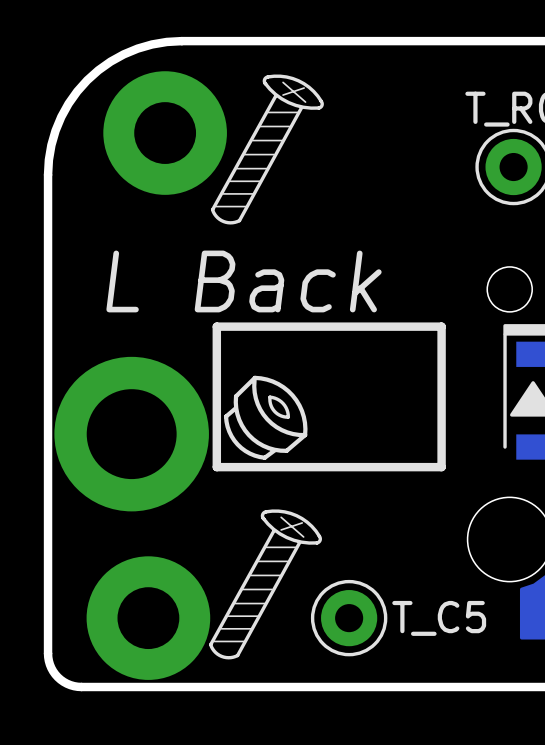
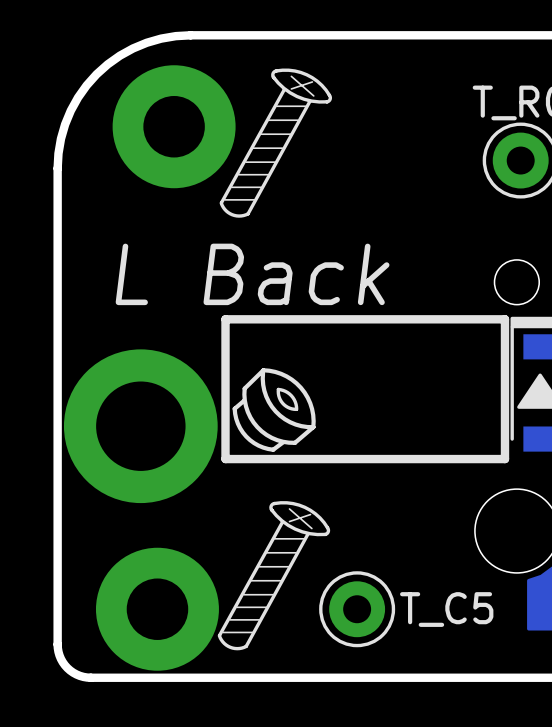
line: (441, 326) (441, 467) -> (449, 319) (504, 319) (504, 459) (449, 459)

